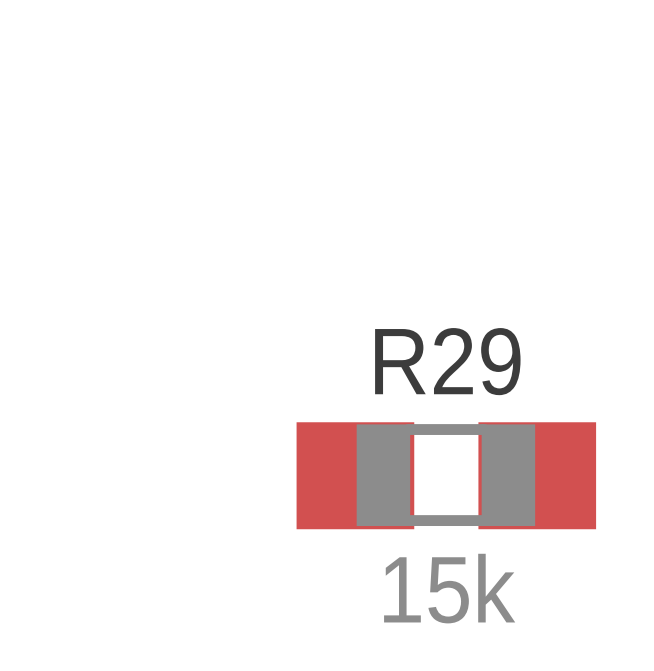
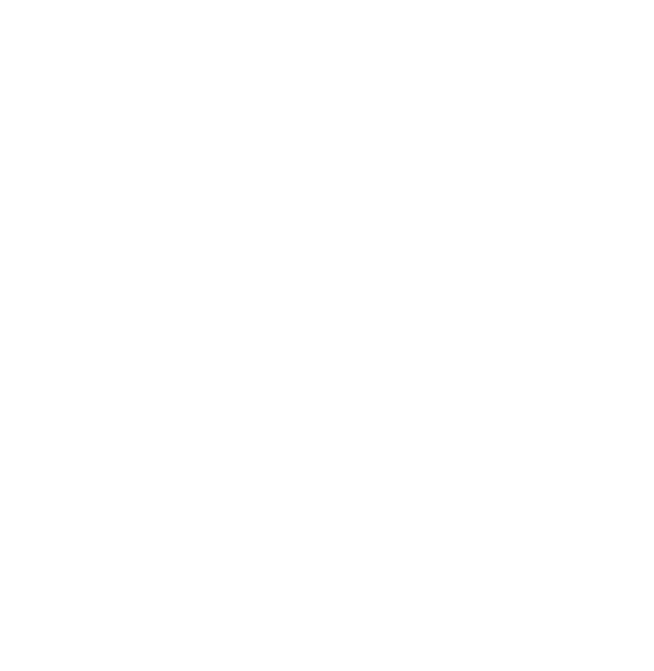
R29: 15k (446, 475) -> none

